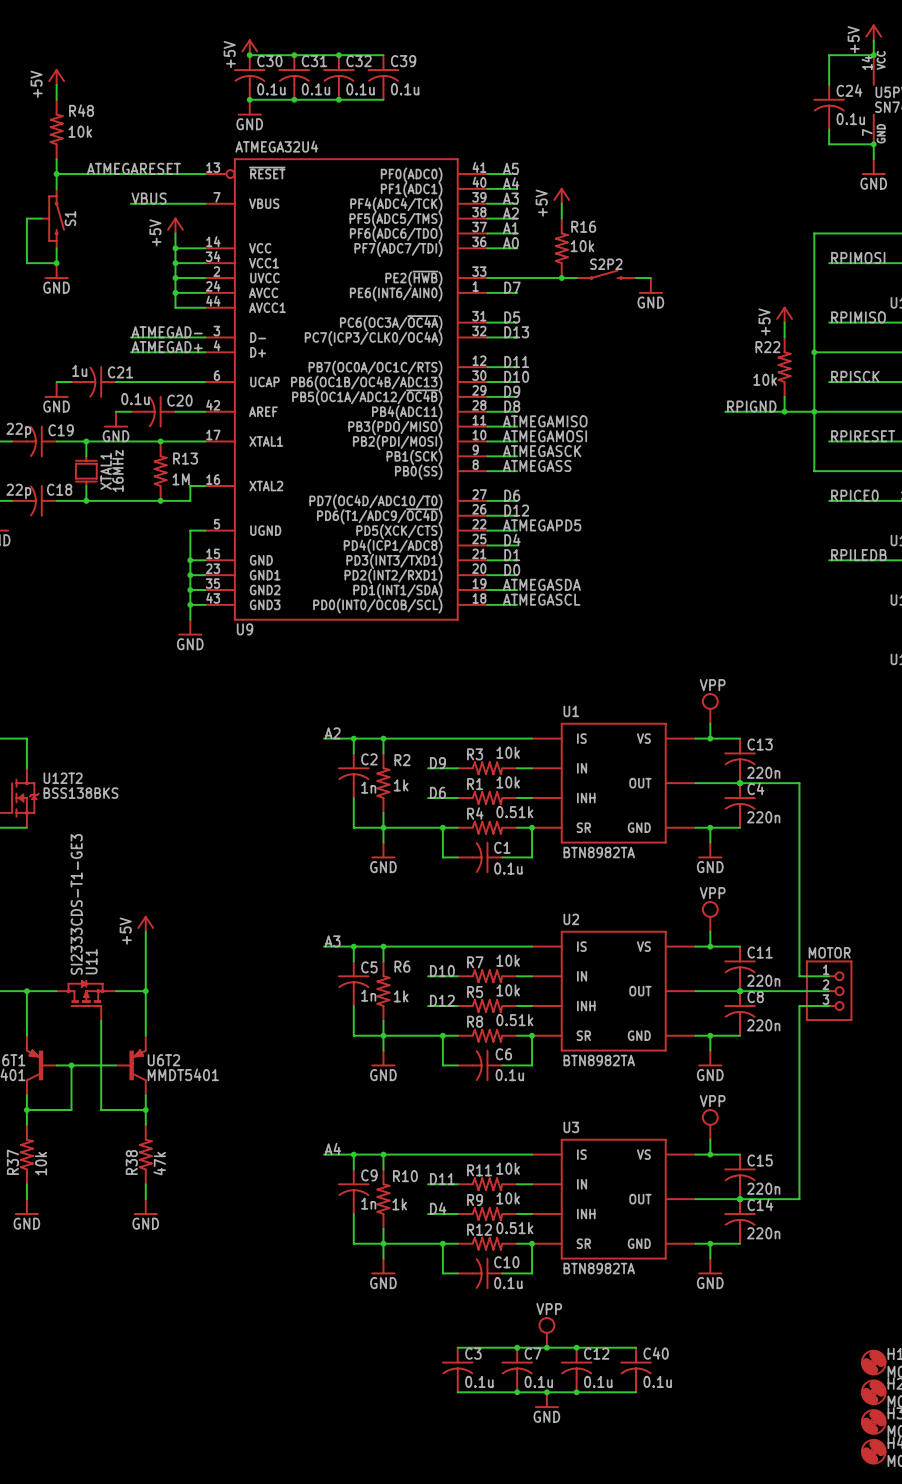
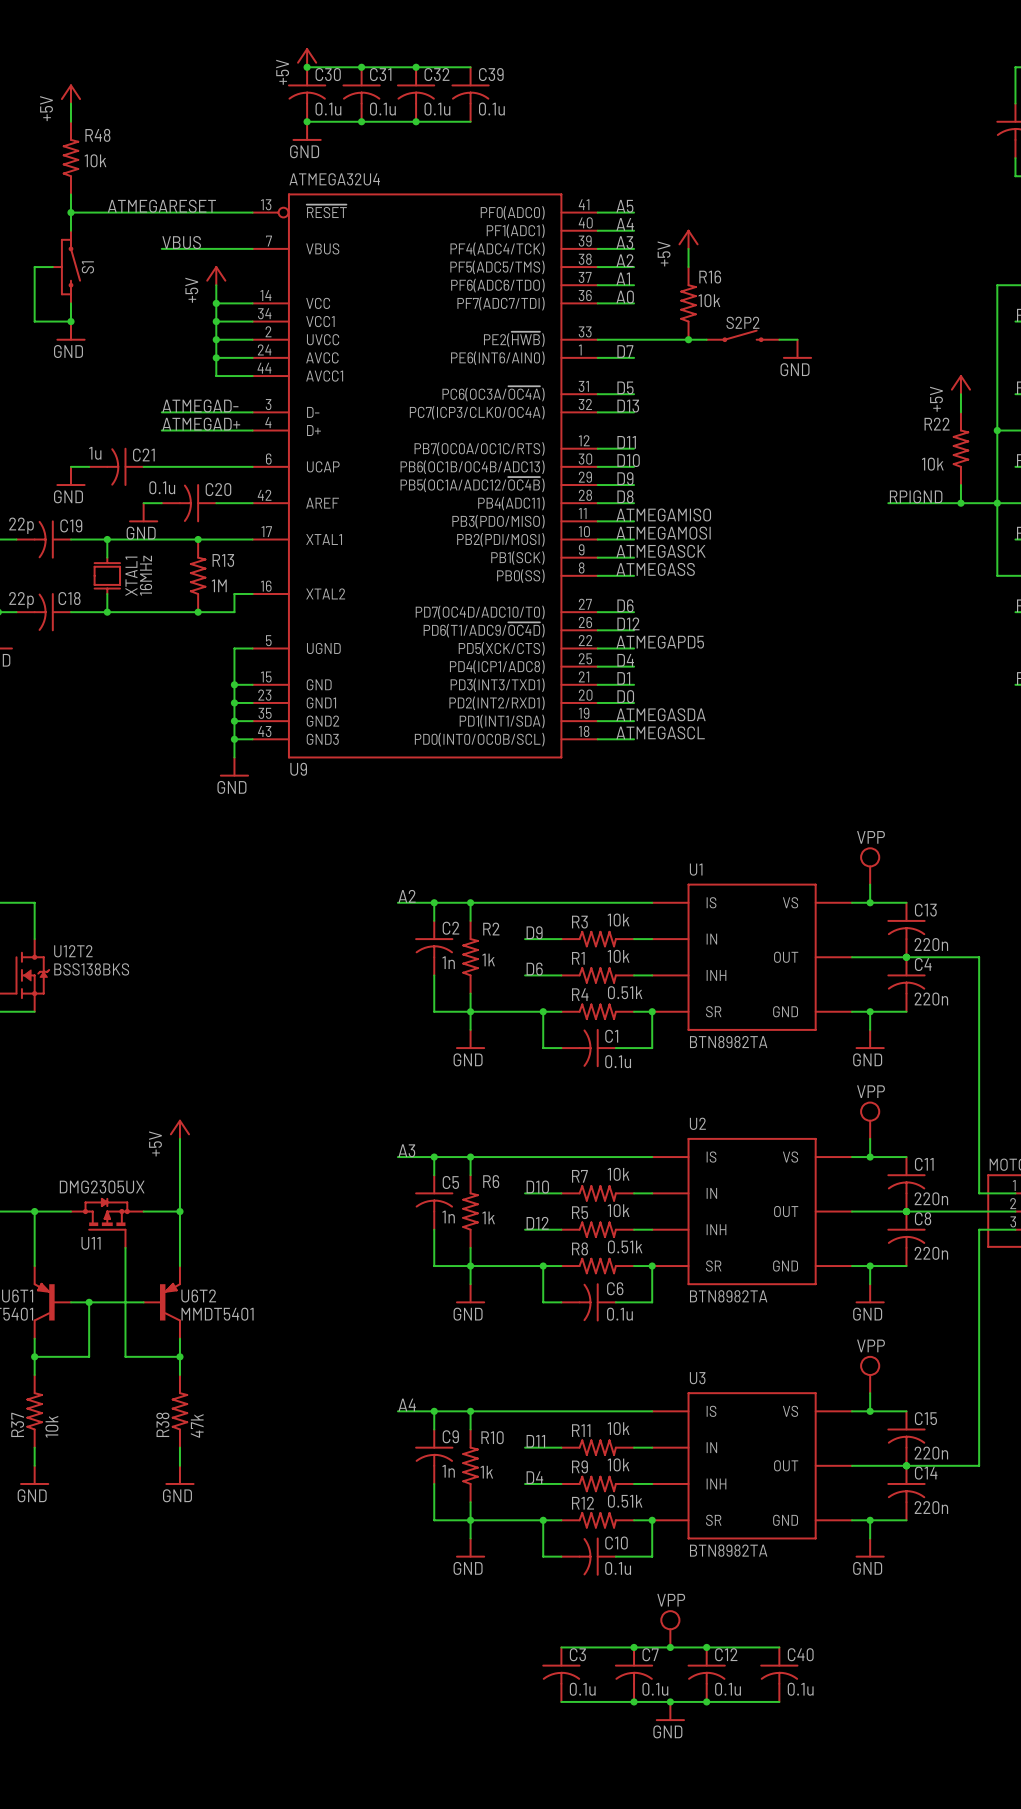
U11 value: SI2333CDS-T1-GE3 (76, 904) -> DMG2305UX (102, 1187)
U11 name rotation: 0° (91, 961) -> 90° clockwise (91, 1243)
U11 name position: U11 (91, 961) -> U11 (91, 1243)

